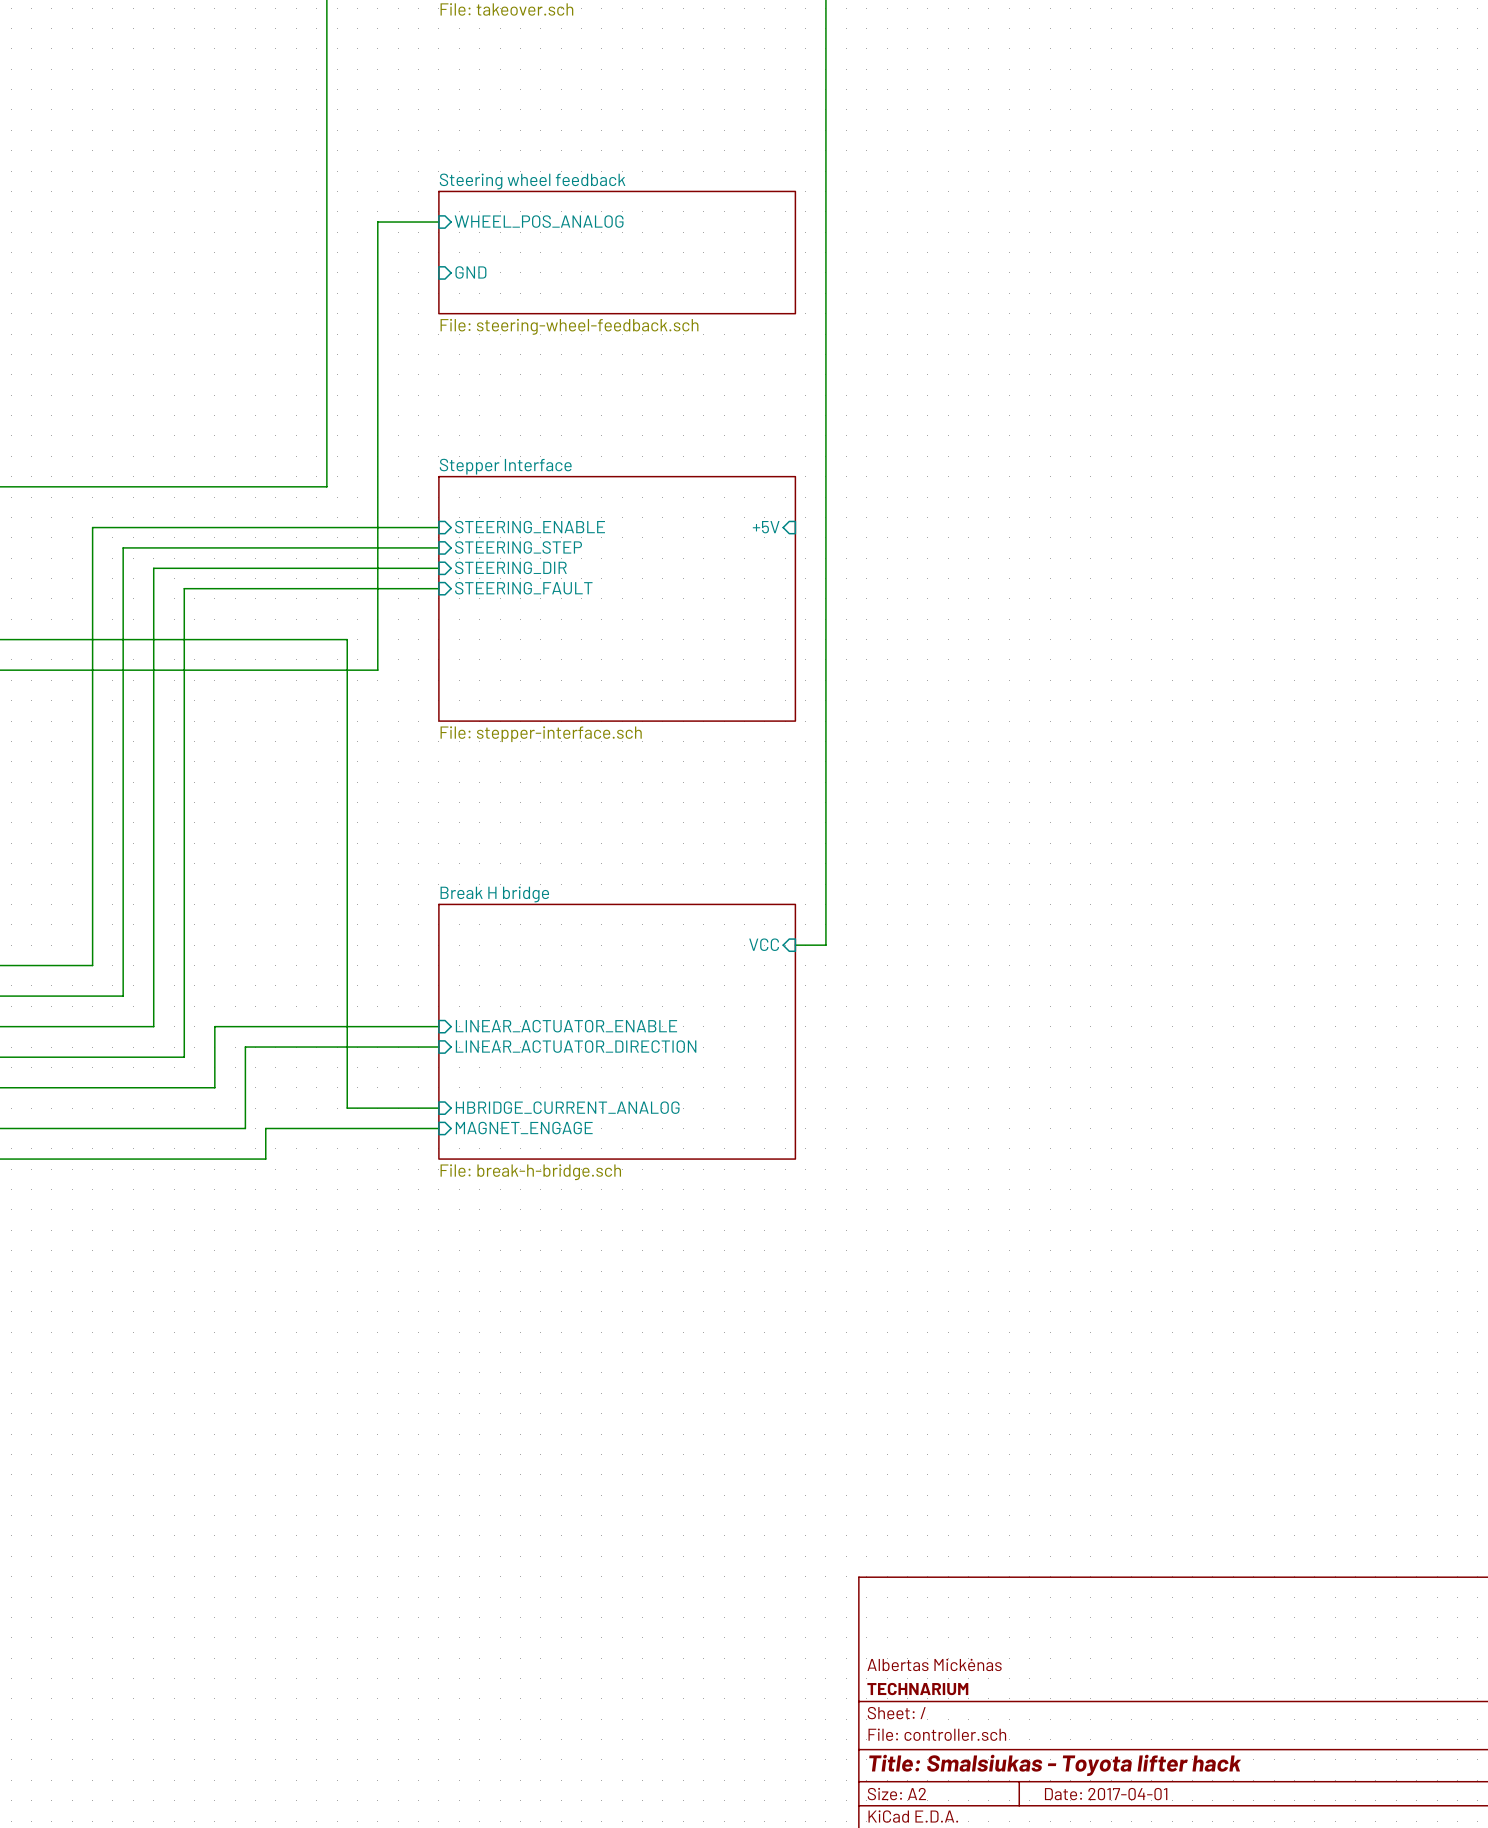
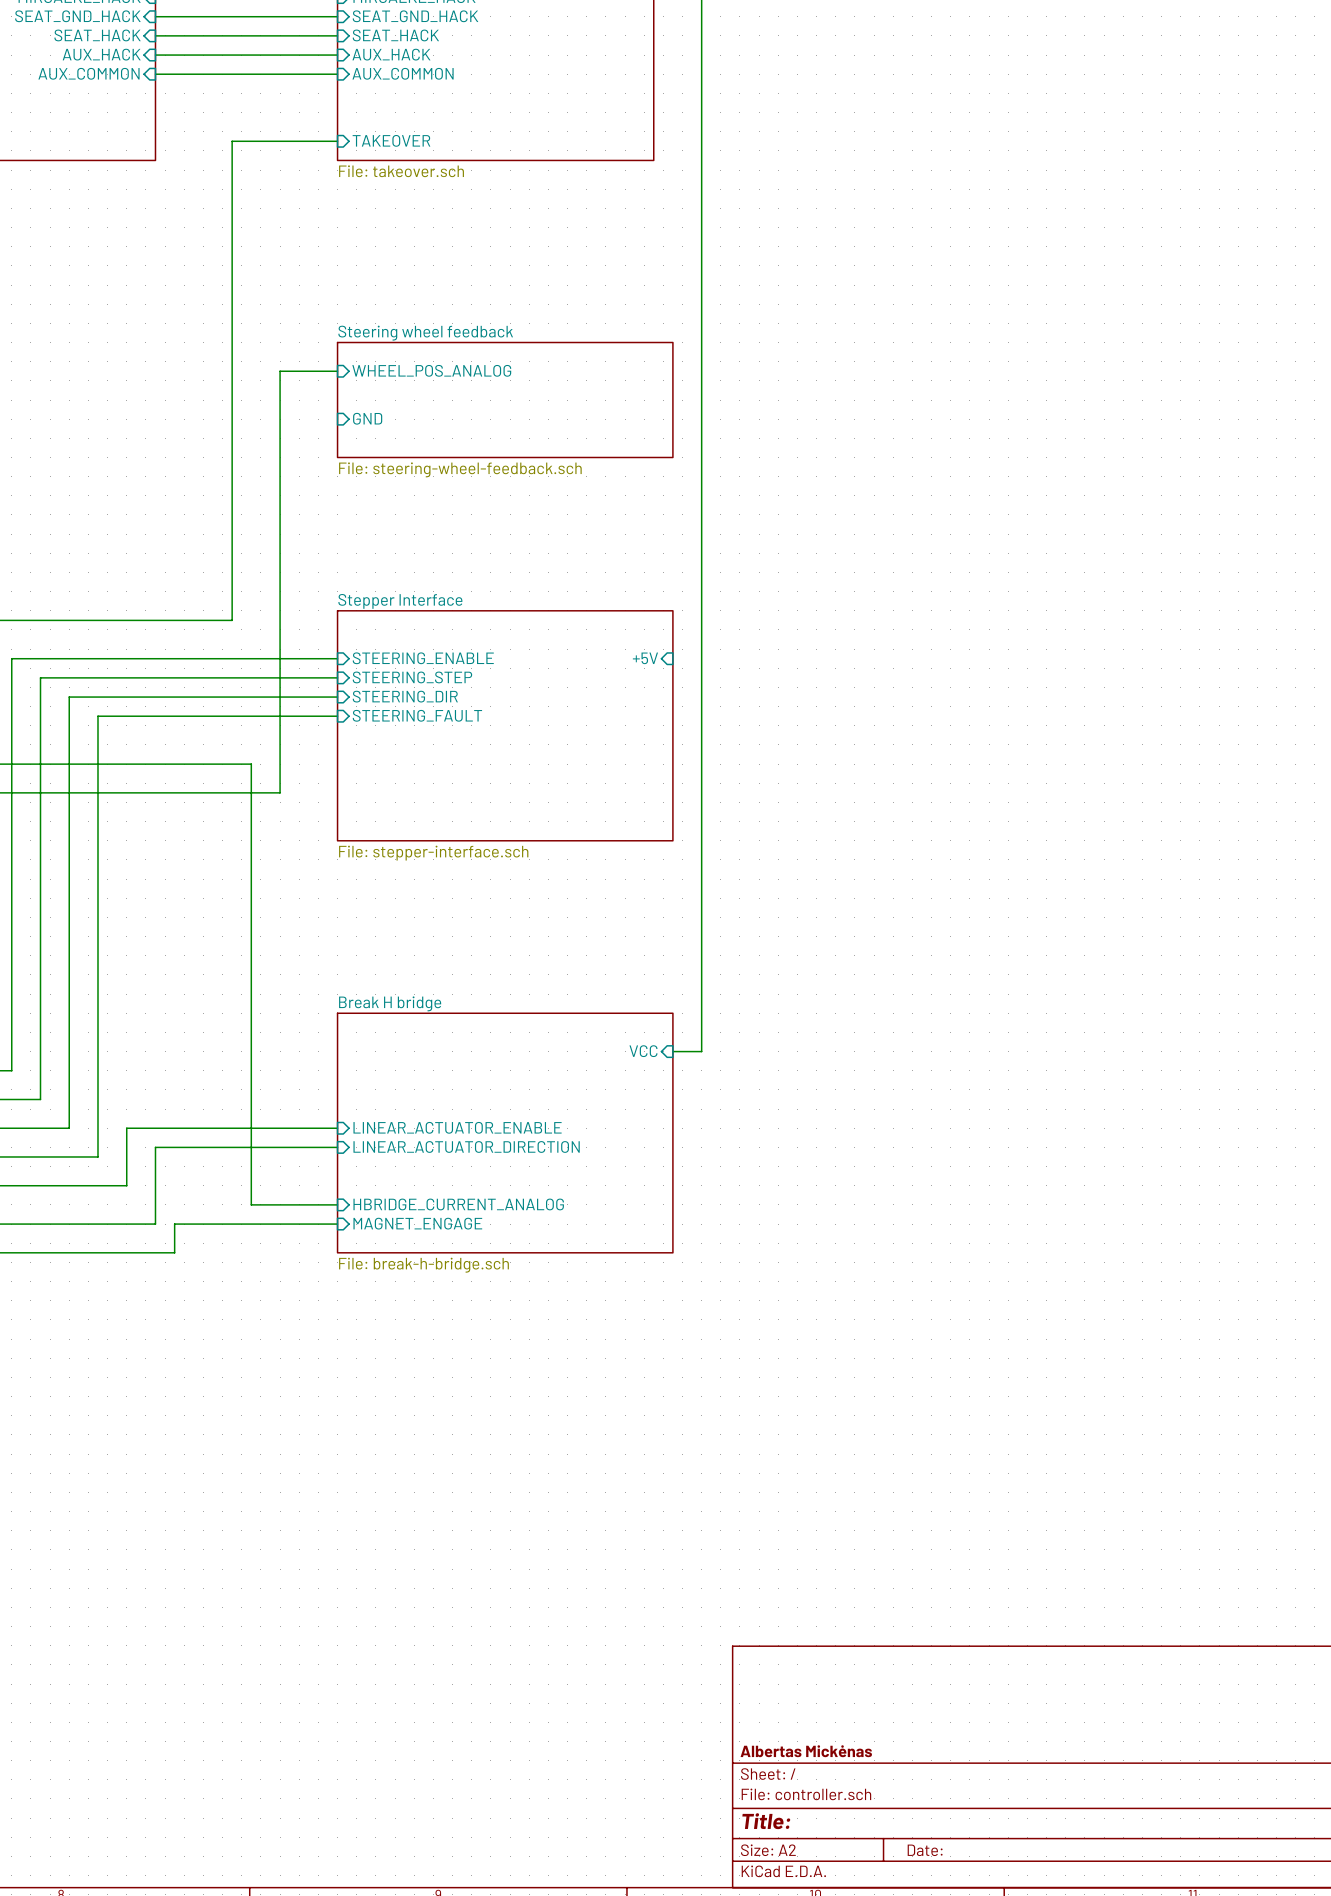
title block: Albertas Mickėnas (934, 1664) -> none
title block: TECHNARIUM (917, 1689) -> Albertas Mickėnas (806, 1751)
title block: Title: Smalsiukas - Toyota lifter hack (1055, 1765) -> Title: (766, 1821)
title block: Date: 2017-04-01 (1106, 1794) -> Date: (925, 1850)

